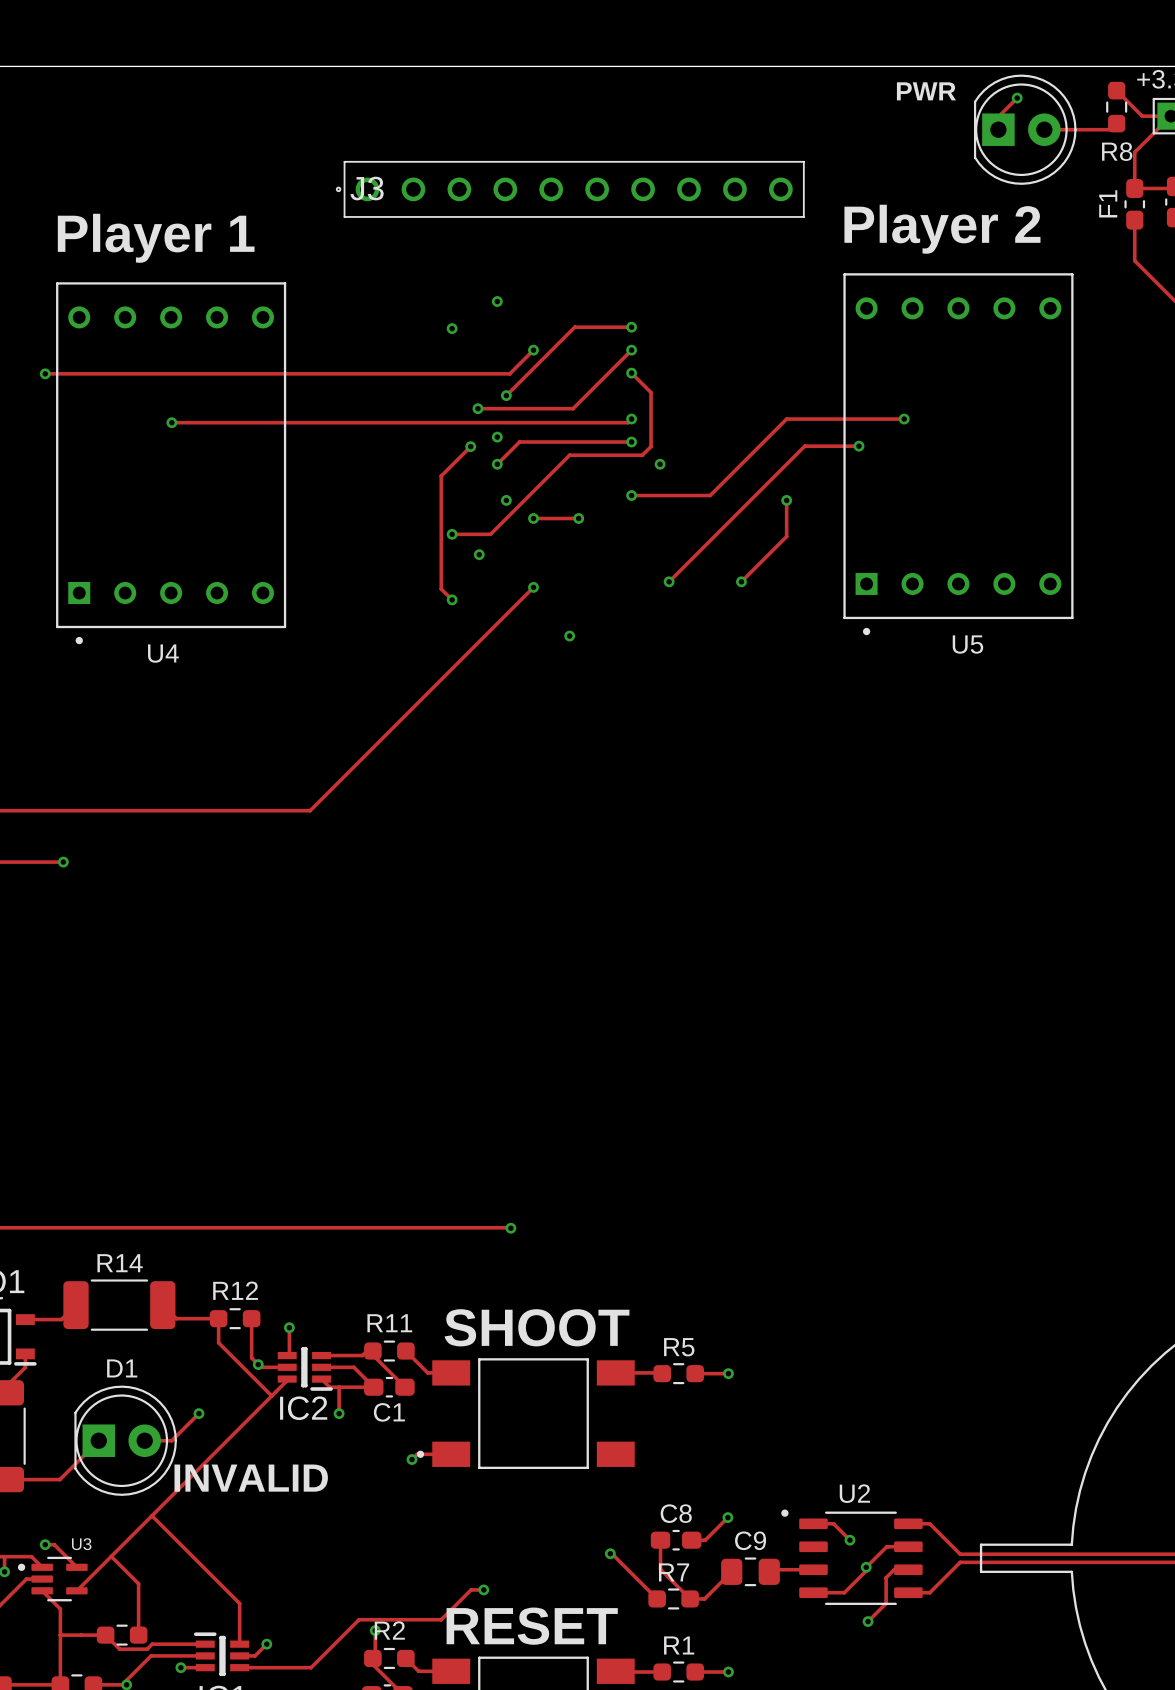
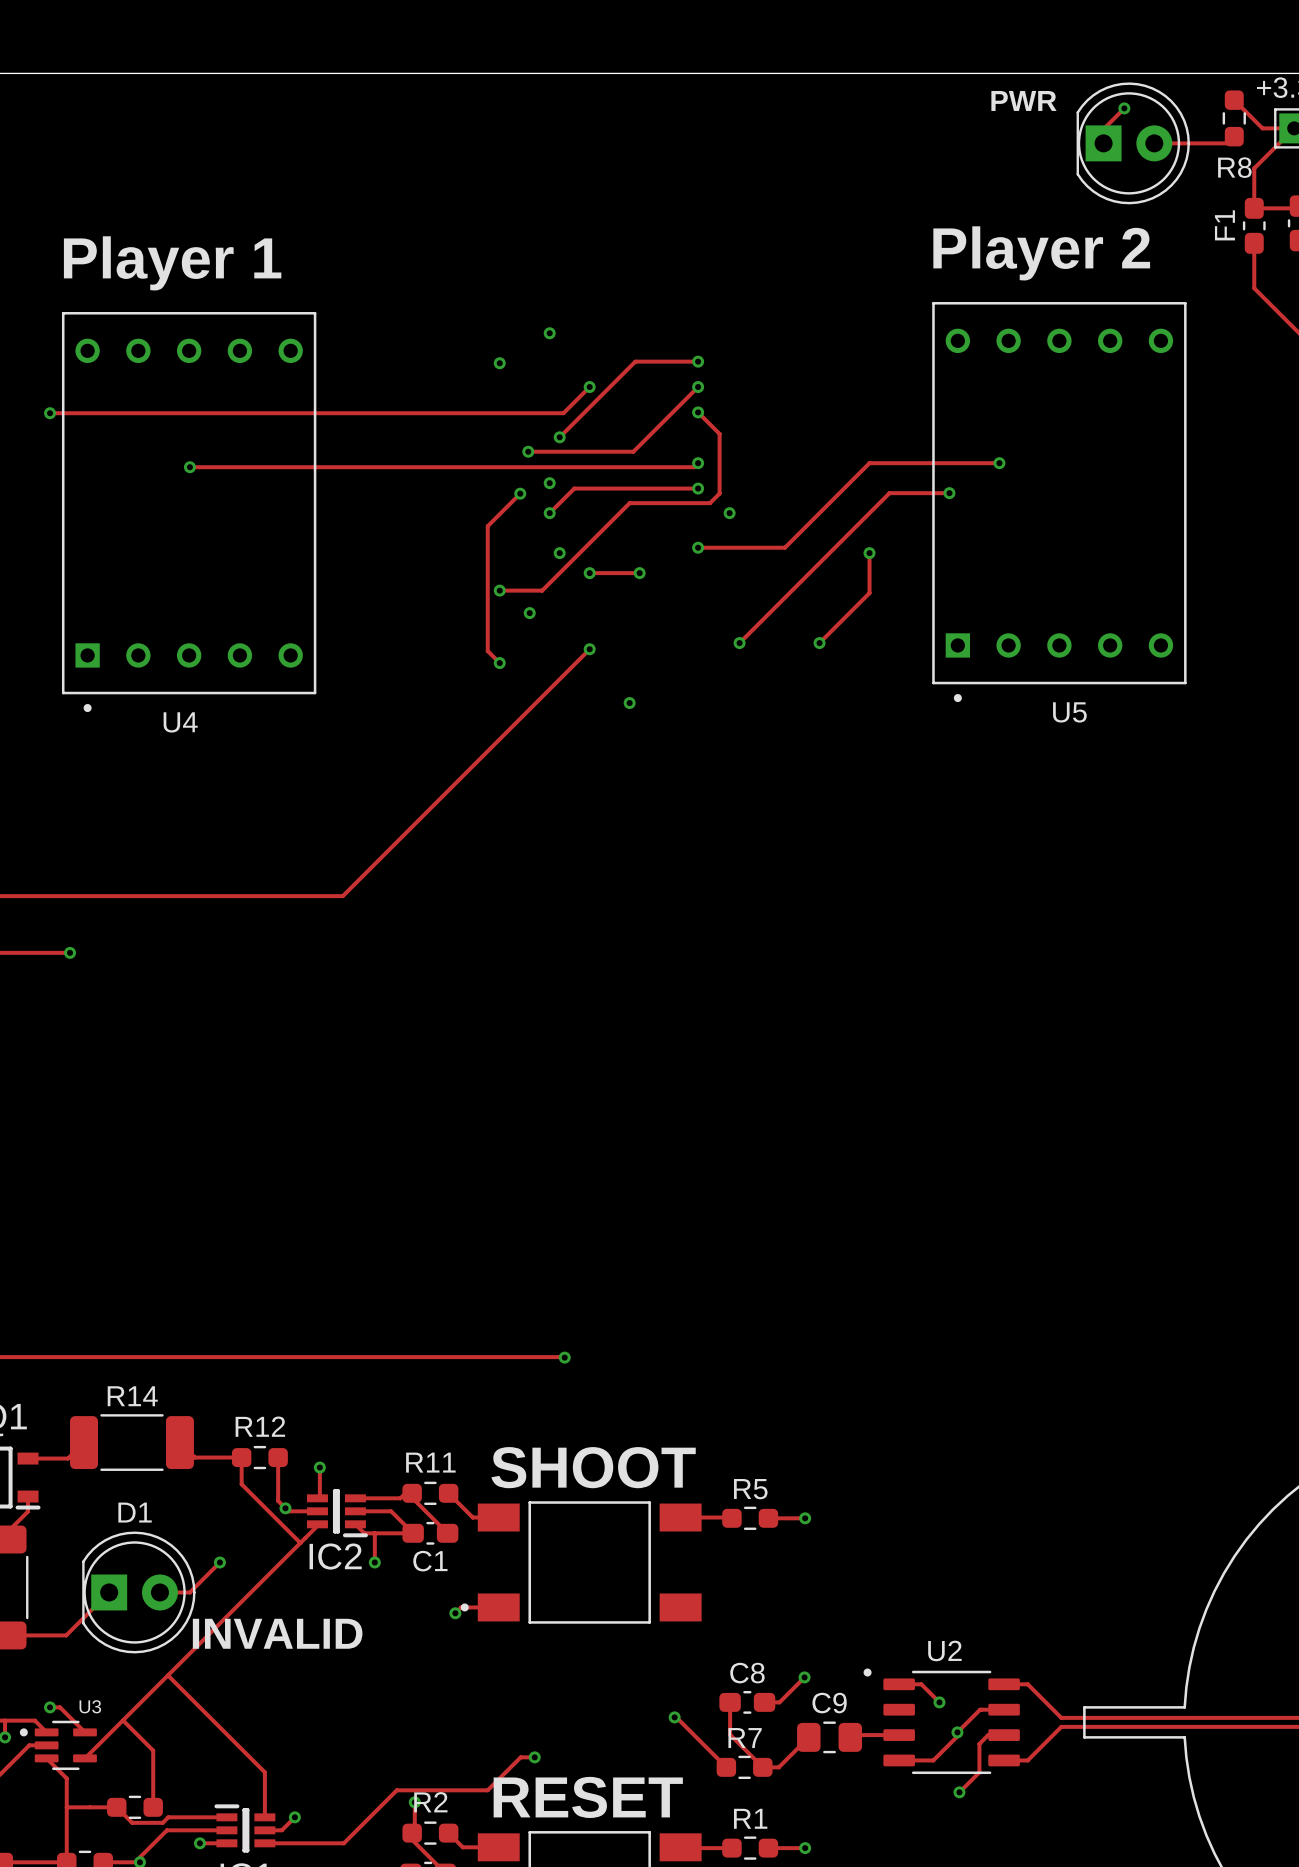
J3: (570, 189) -> none

